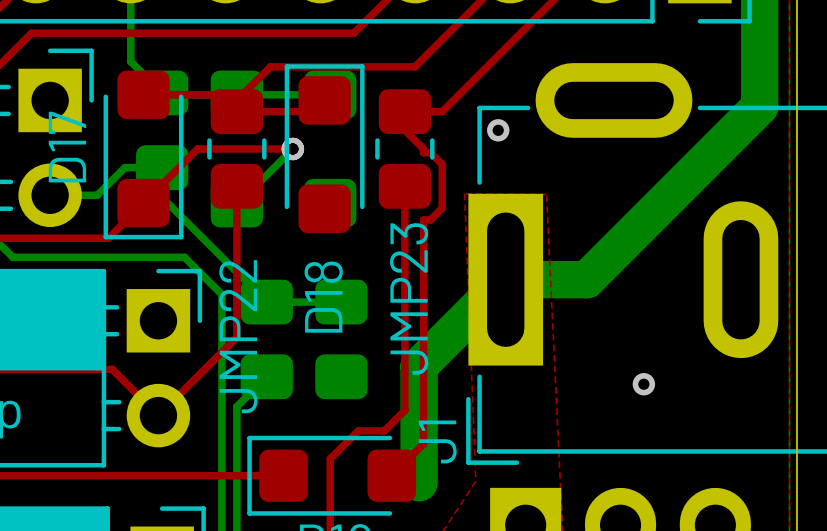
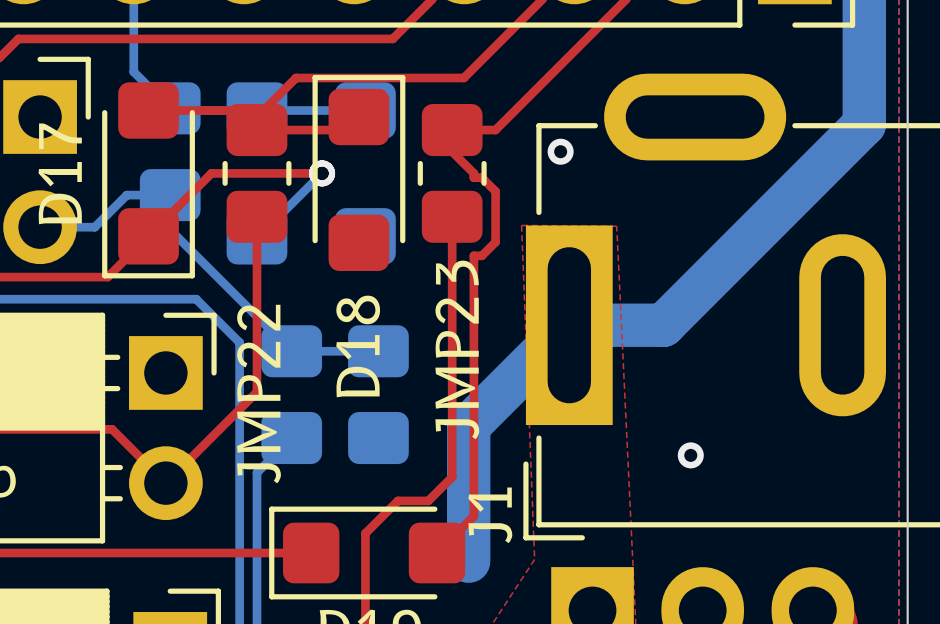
via position: (643, 384) -> (690, 455)

